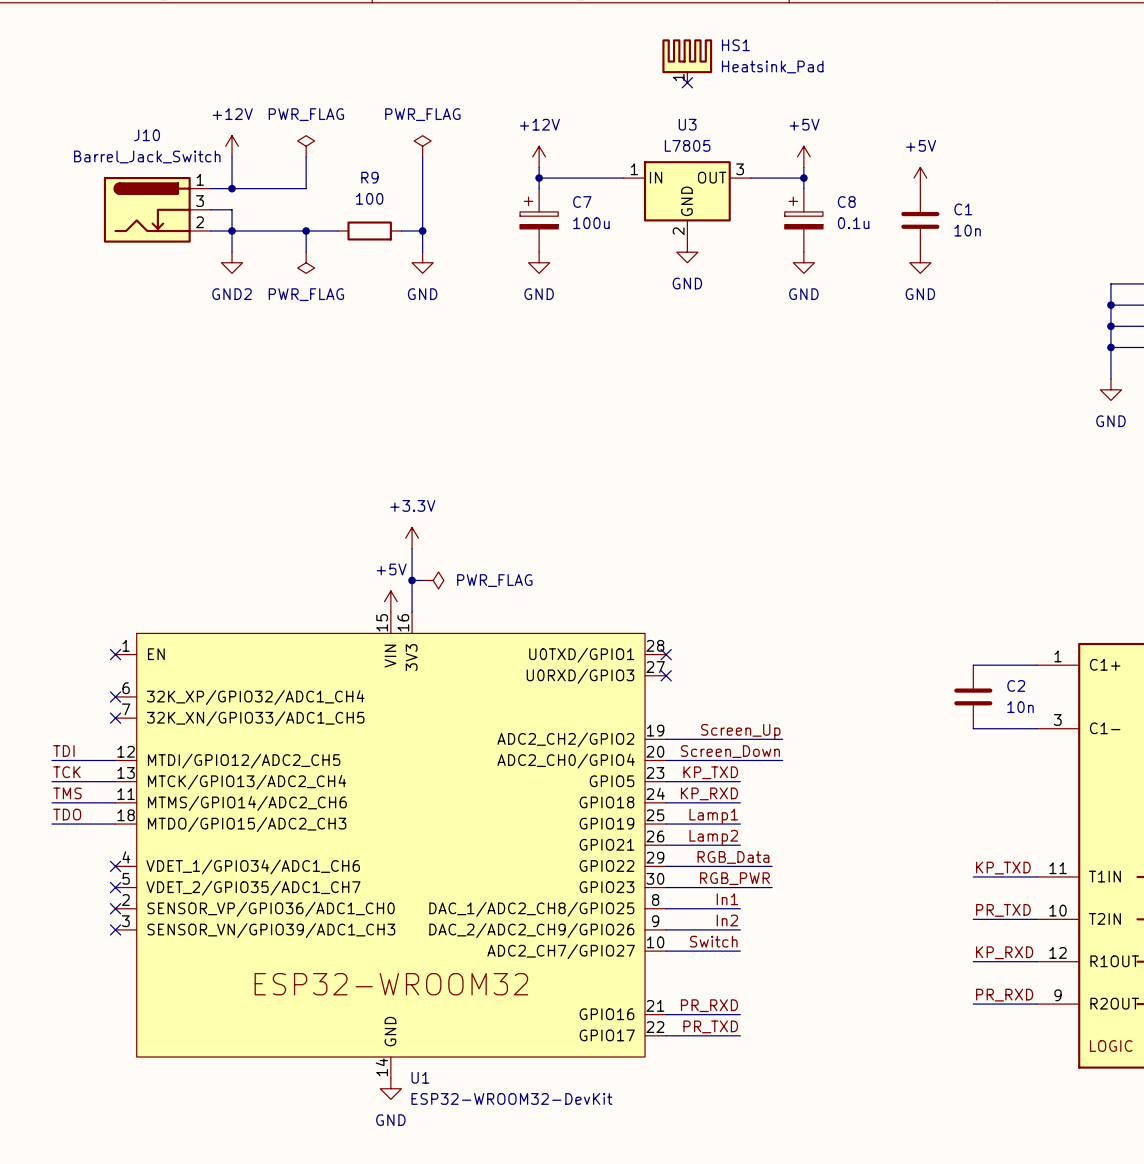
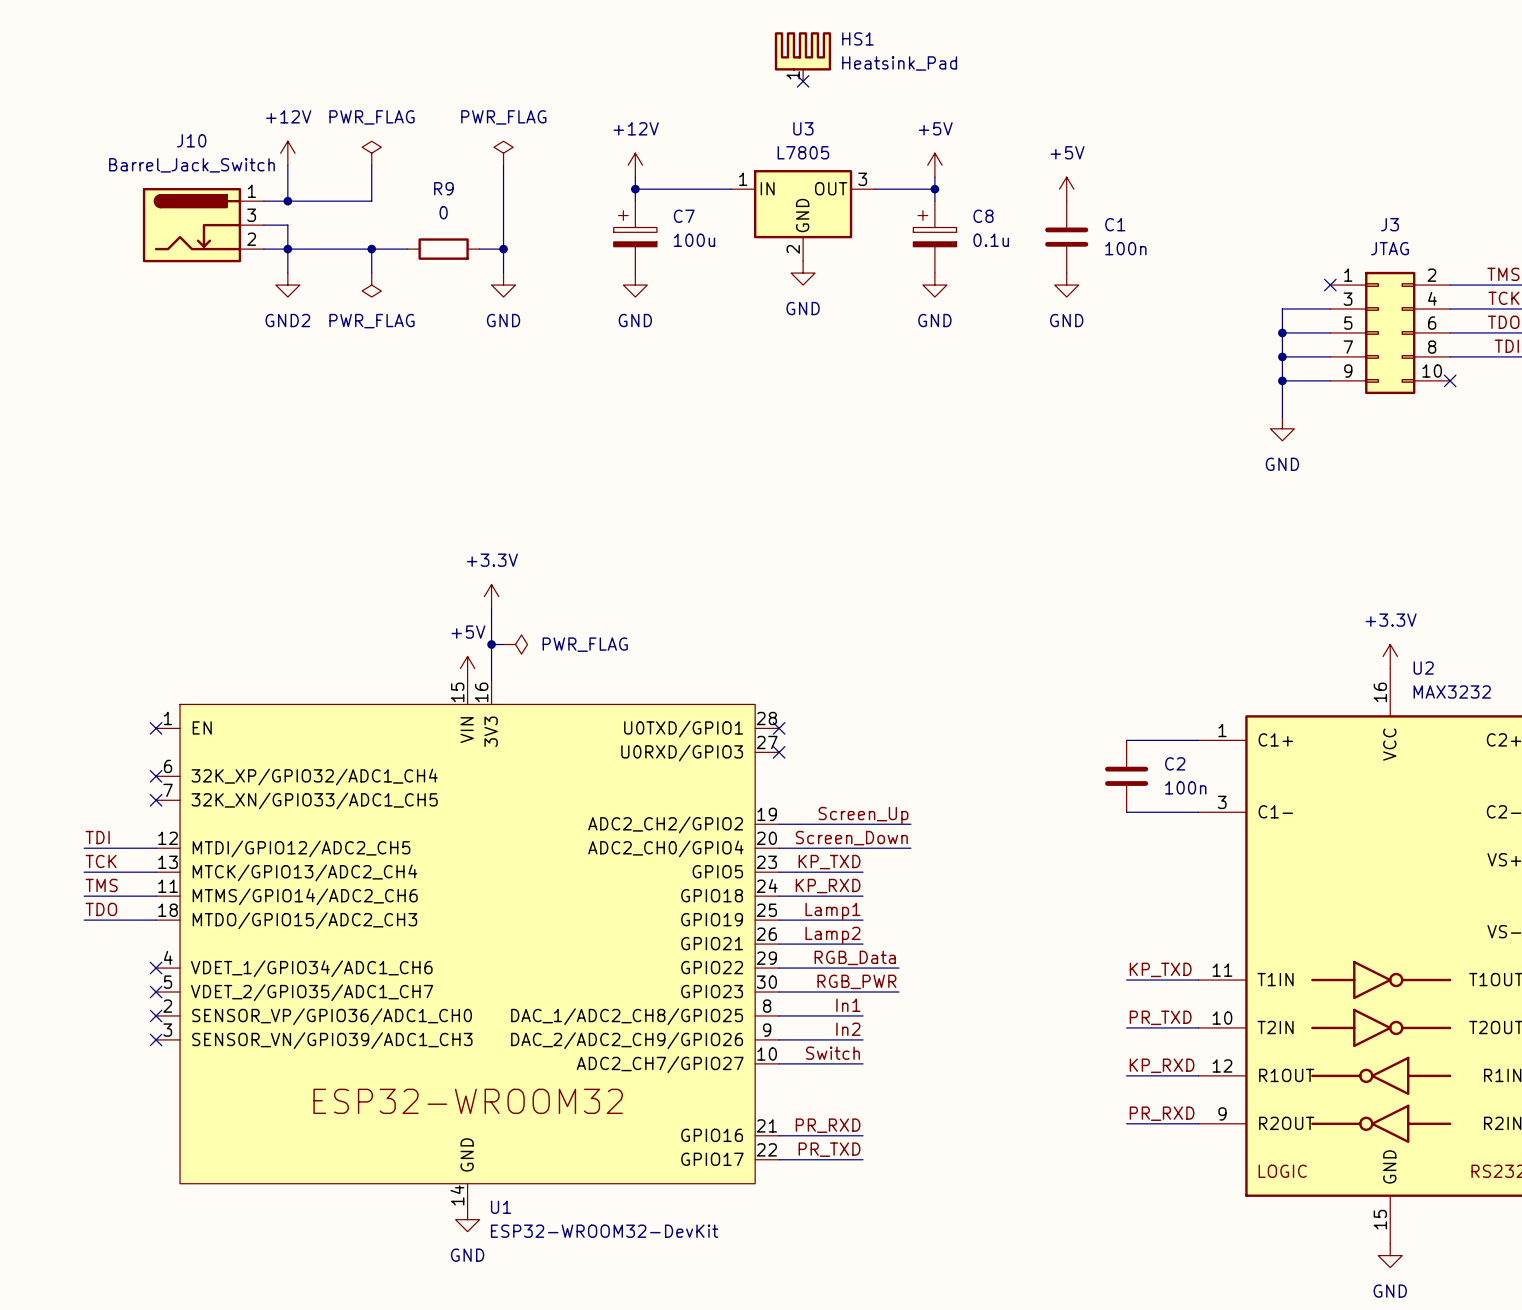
R9 value: 100 (369, 198) -> 0 (443, 212)
C1 value: 10n (967, 230) -> 100n (1125, 248)
C2 value: 10n (1020, 707) -> 100n (1185, 787)

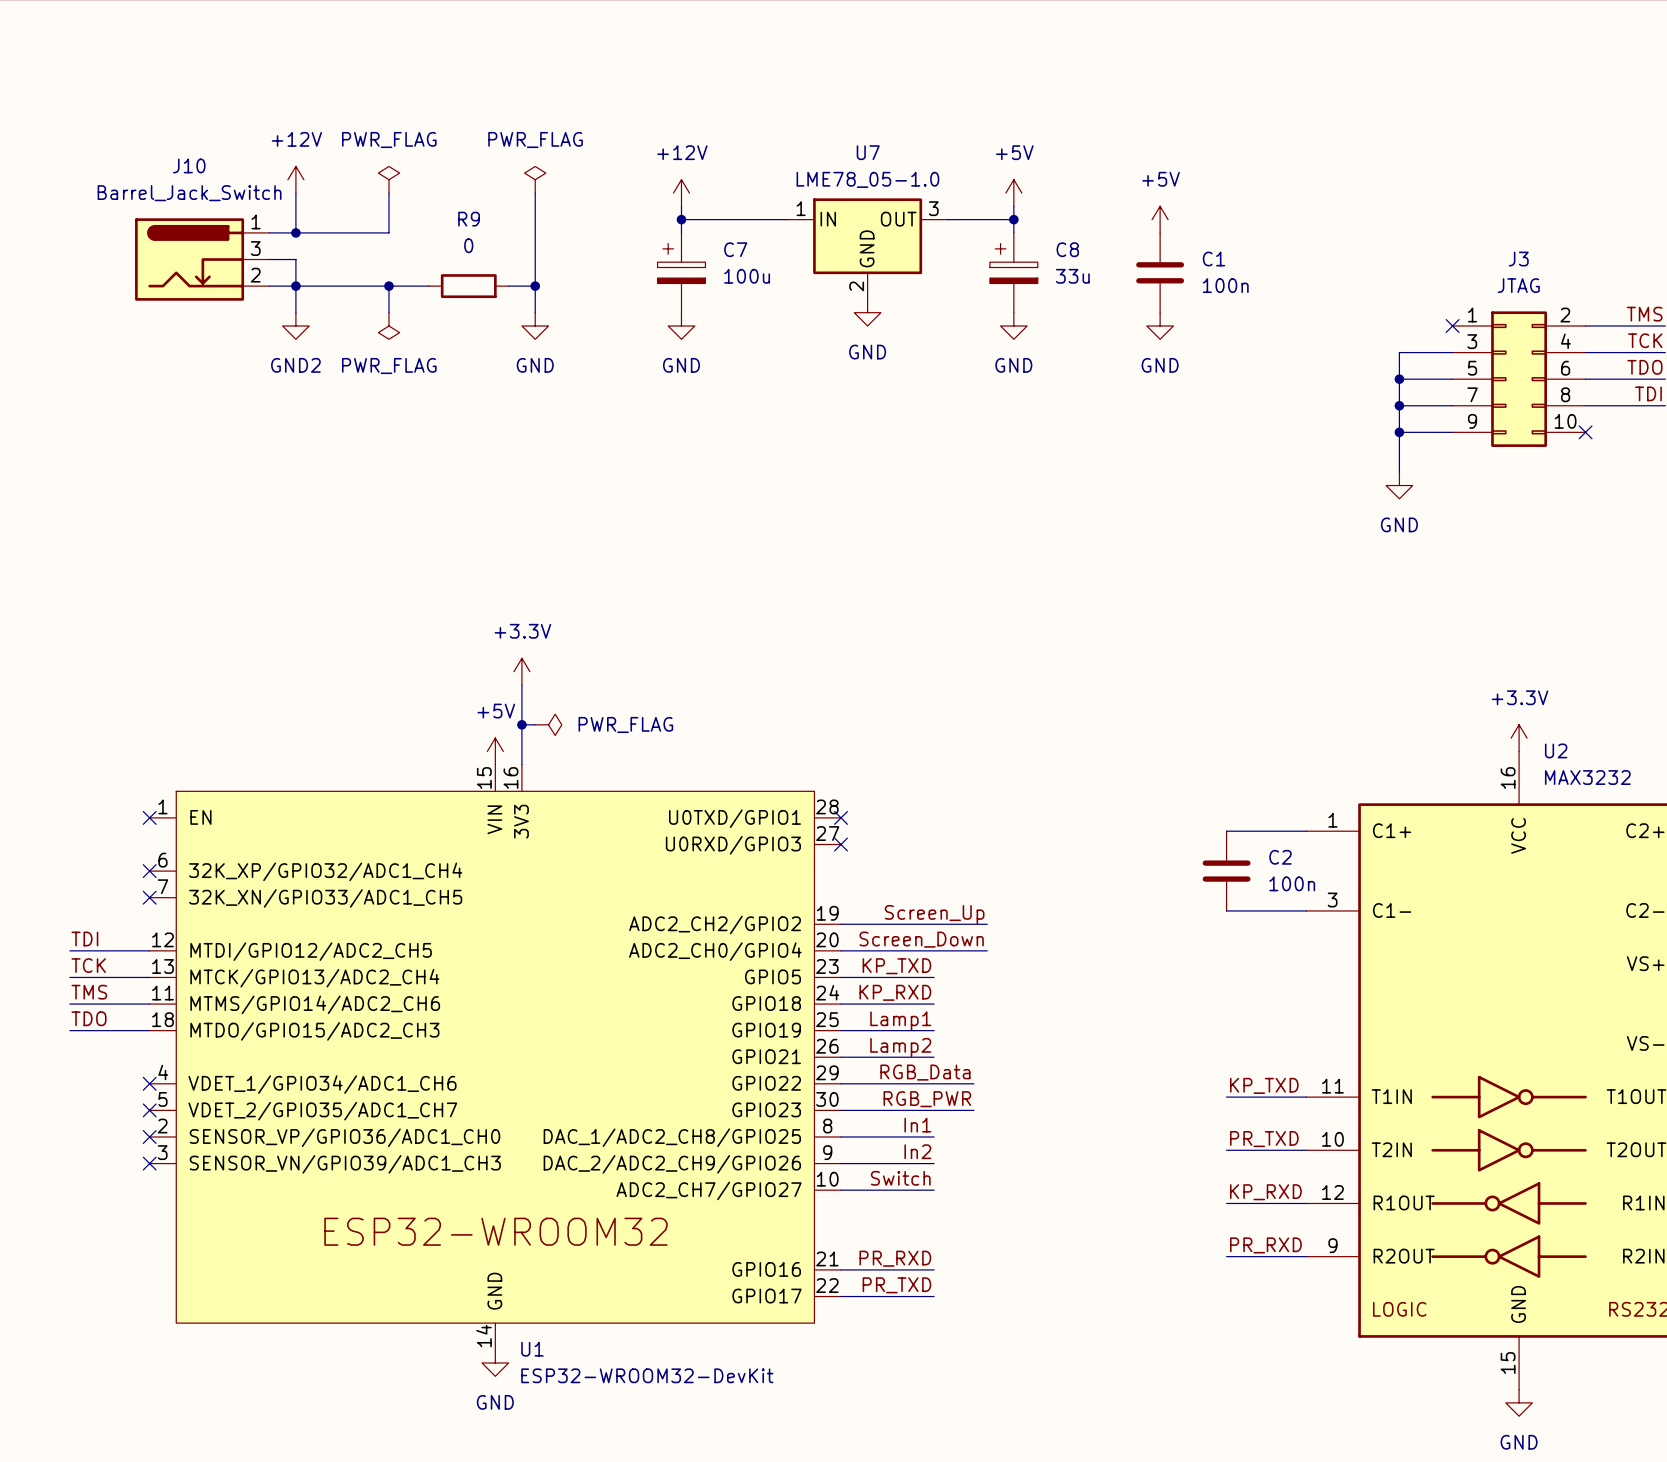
HS1: Heatsink_Pad (802, 56) -> none
no-connect mark: (803, 81) -> none
U3 name: U3 (803, 128) -> U7 (868, 152)
U3 value: L7805 (803, 152) -> LME78_05-1.0 (867, 179)
C8 value: 0.1u (991, 240) -> 33u (1072, 276)

